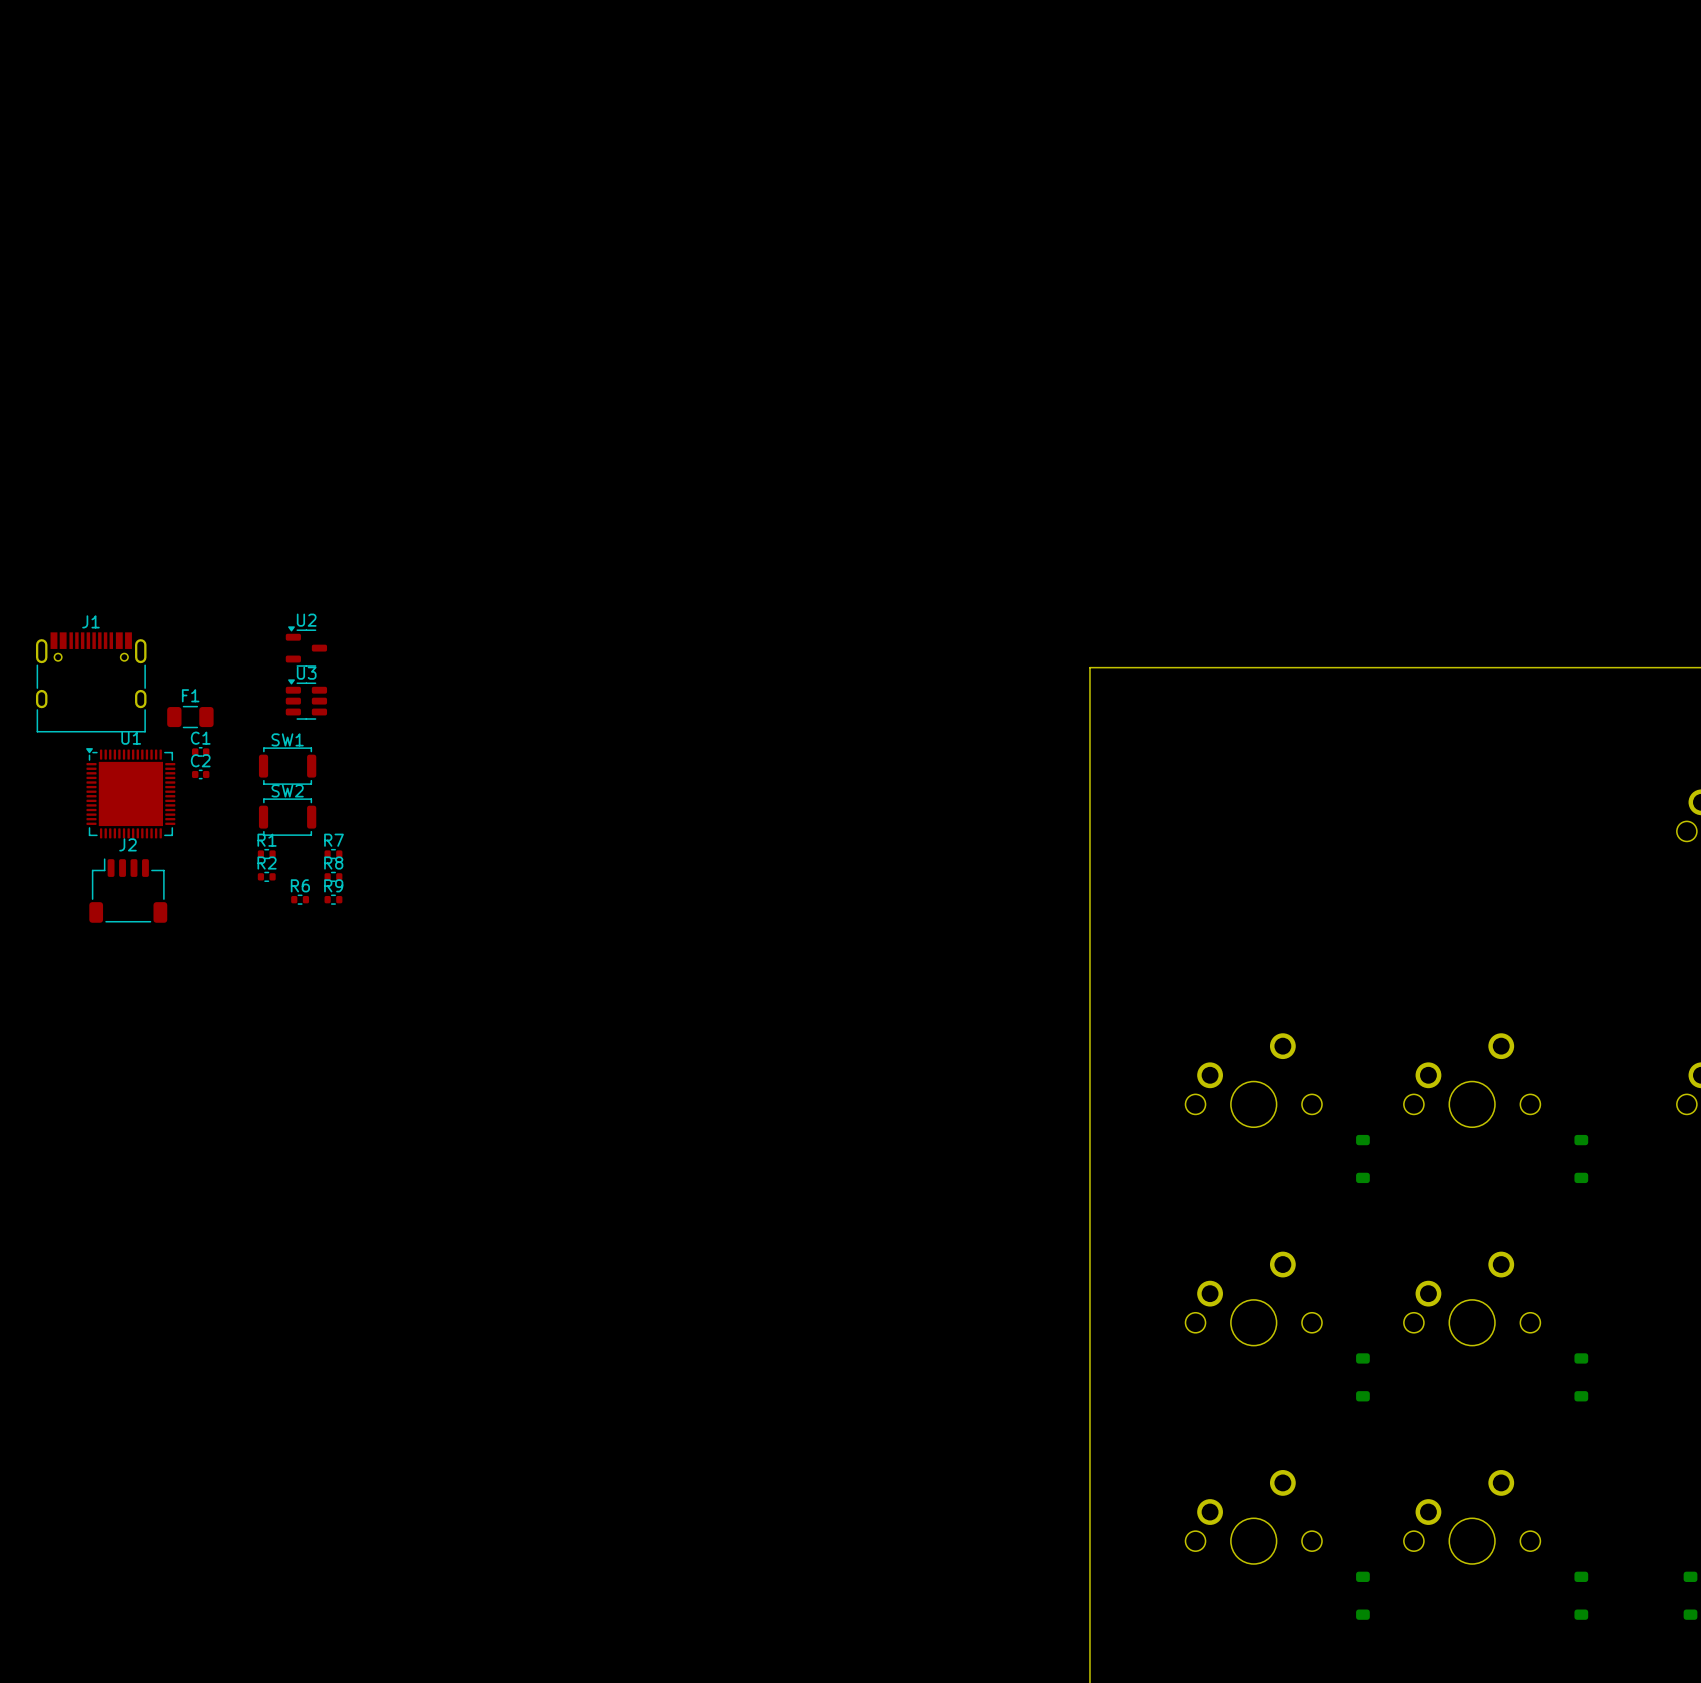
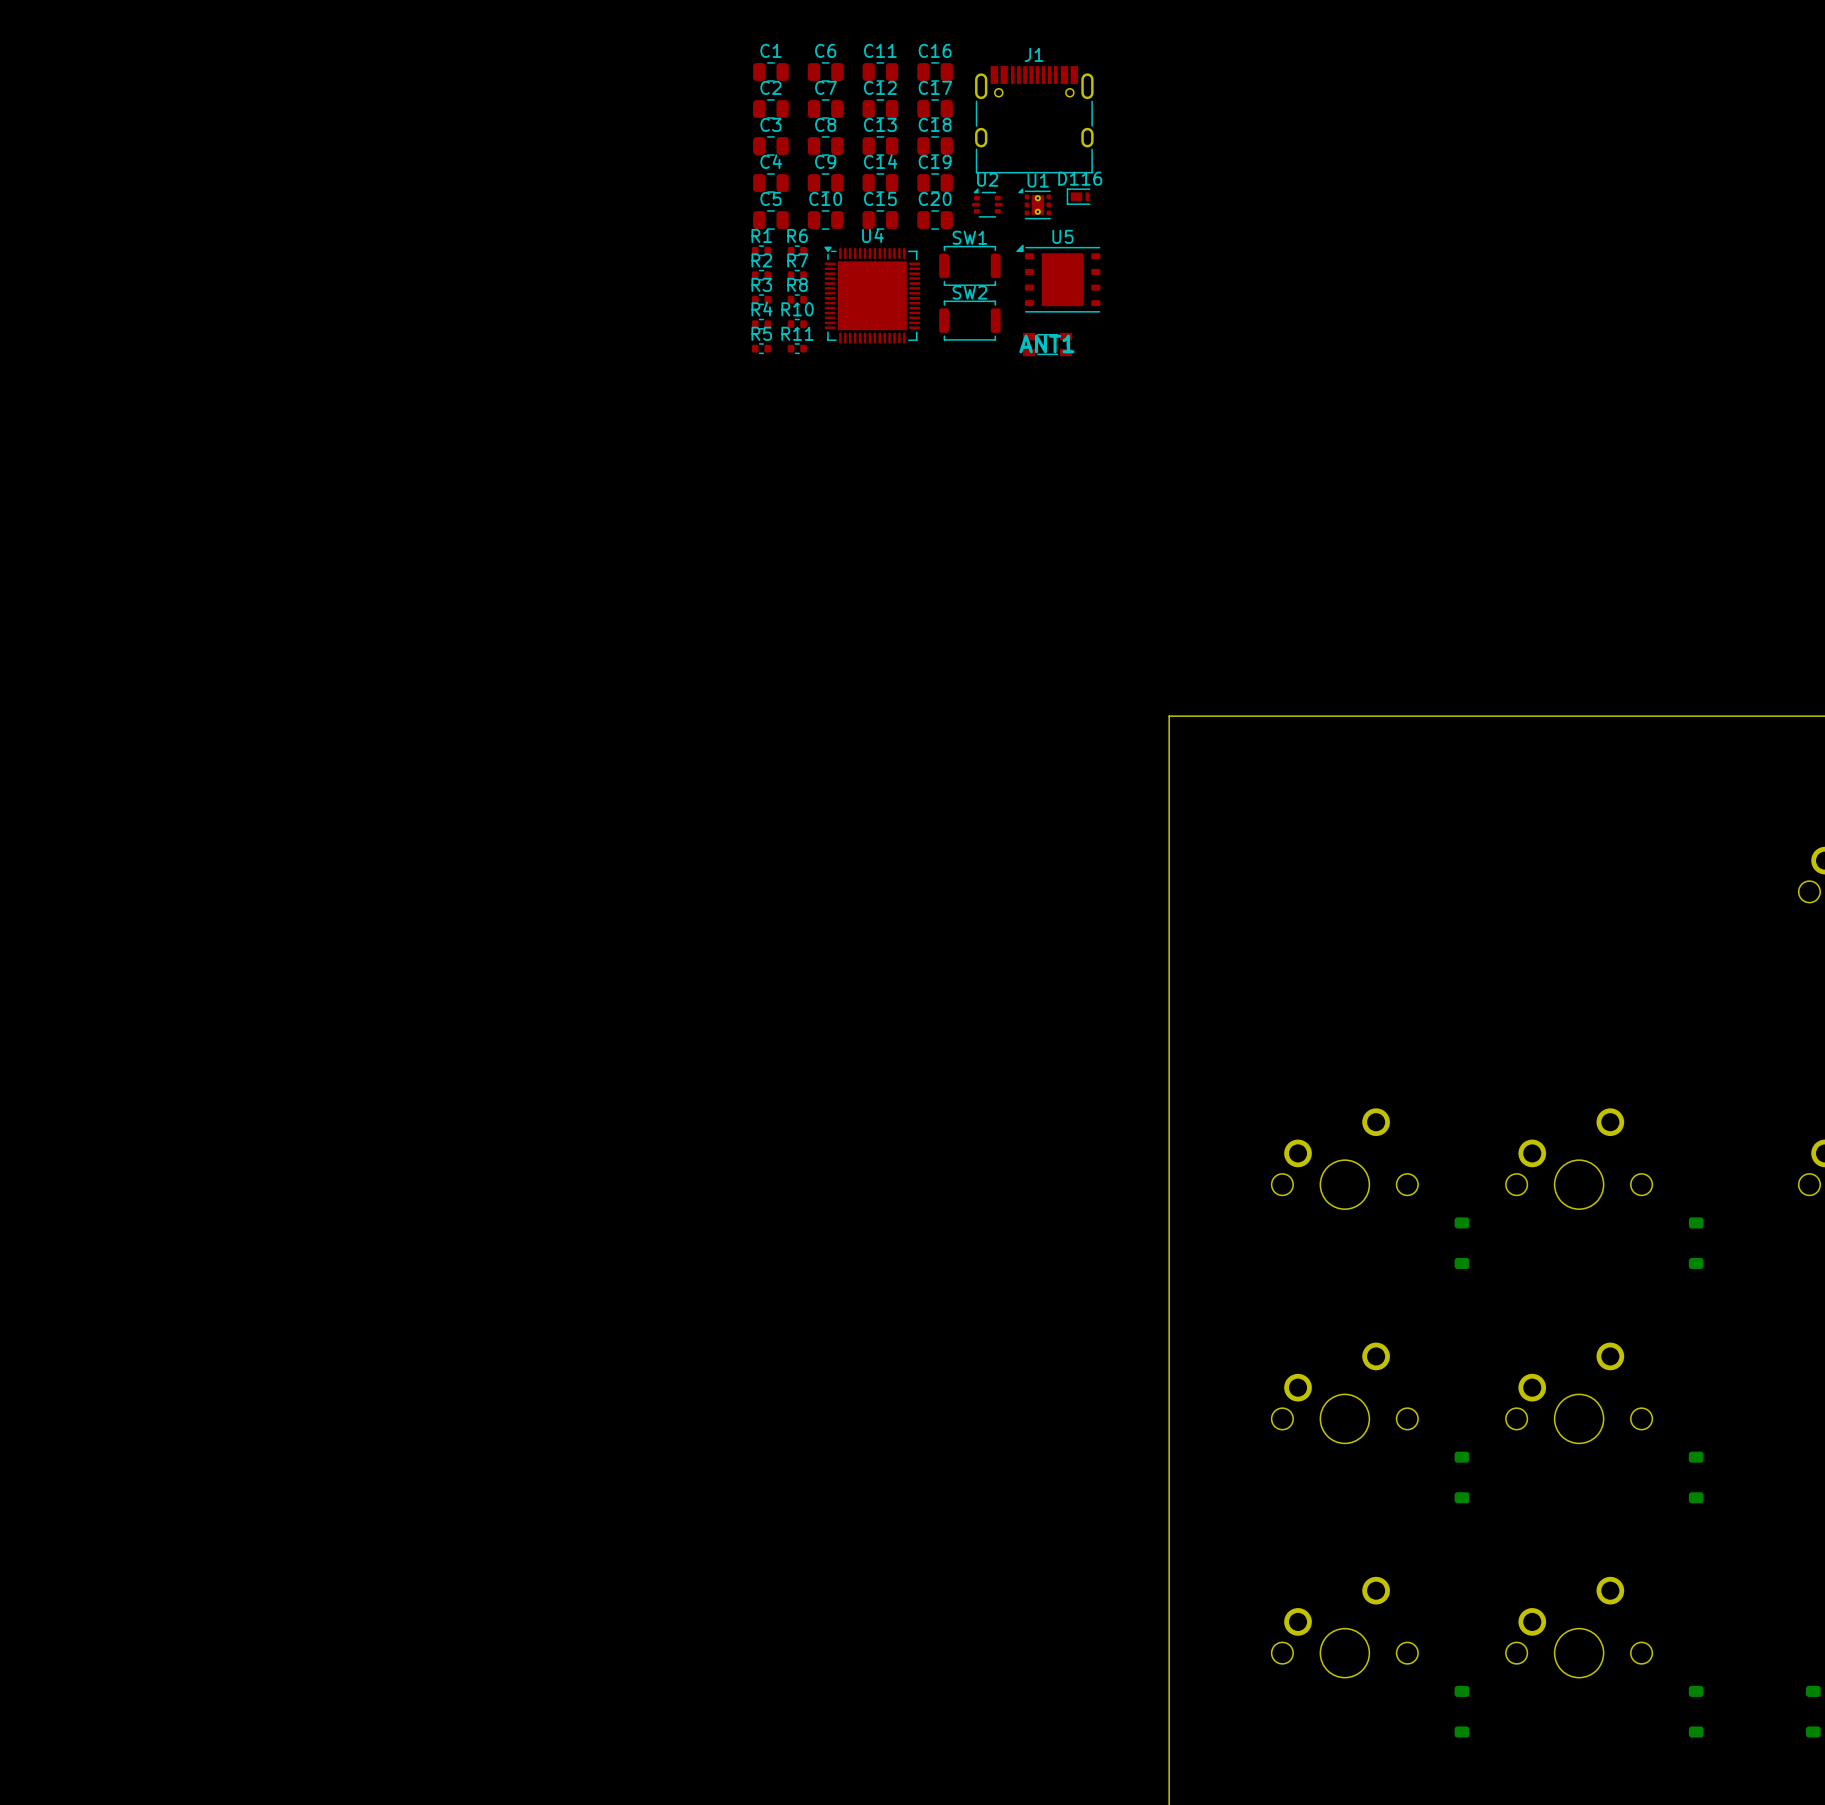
C6: none -> (825, 71)
C11: none -> (880, 71)
C16: none -> (935, 71)
C7: none -> (825, 108)
C12: none -> (880, 108)
C17: none -> (935, 108)
C3: none -> (770, 146)
C8: none -> (825, 146)
C13: none -> (880, 146)
C18: none -> (935, 146)
C4: none -> (770, 183)
C9: none -> (825, 183)
C14: none -> (880, 183)
C19: none -> (935, 183)
D116: none -> (1078, 196)
C5: none -> (770, 220)
C10: none -> (825, 220)
C15: none -> (880, 220)
C20: none -> (935, 220)
U5: none -> (1058, 278)
U4: none -> (872, 295)
R3: none -> (761, 299)
R4: none -> (761, 324)
R10: none -> (797, 324)
ANT1: none -> (1047, 344)
R5: none -> (761, 348)
R11: none -> (797, 348)
U2 footprint: [285, 626, 328, 667] -> [971, 188, 1003, 218]
J1 position: (91, 682) -> (1034, 119)
U3: (306, 699) -> none
F1: (190, 717) -> none
U1 name position: U1 (131, 738) -> U1 (1038, 180)
C1 footprint: [192, 747, 210, 757] -> [753, 62, 789, 82]
U1 footprint: [86, 748, 176, 839] -> [1018, 188, 1052, 220]
SW1 position: (287, 766) -> (969, 265)
C2 footprint: [192, 769, 210, 780] -> [753, 99, 789, 119]
SW2 position: (287, 817) -> (969, 320)
R1 position: (266, 854) -> (761, 250)
R7 position: (333, 854) -> (797, 275)
R2 position: (266, 876) -> (761, 275)
R8 position: (333, 876) -> (797, 299)
J2: (128, 890) -> none
R6 position: (300, 899) -> (797, 250)
R9: (333, 899) -> none

